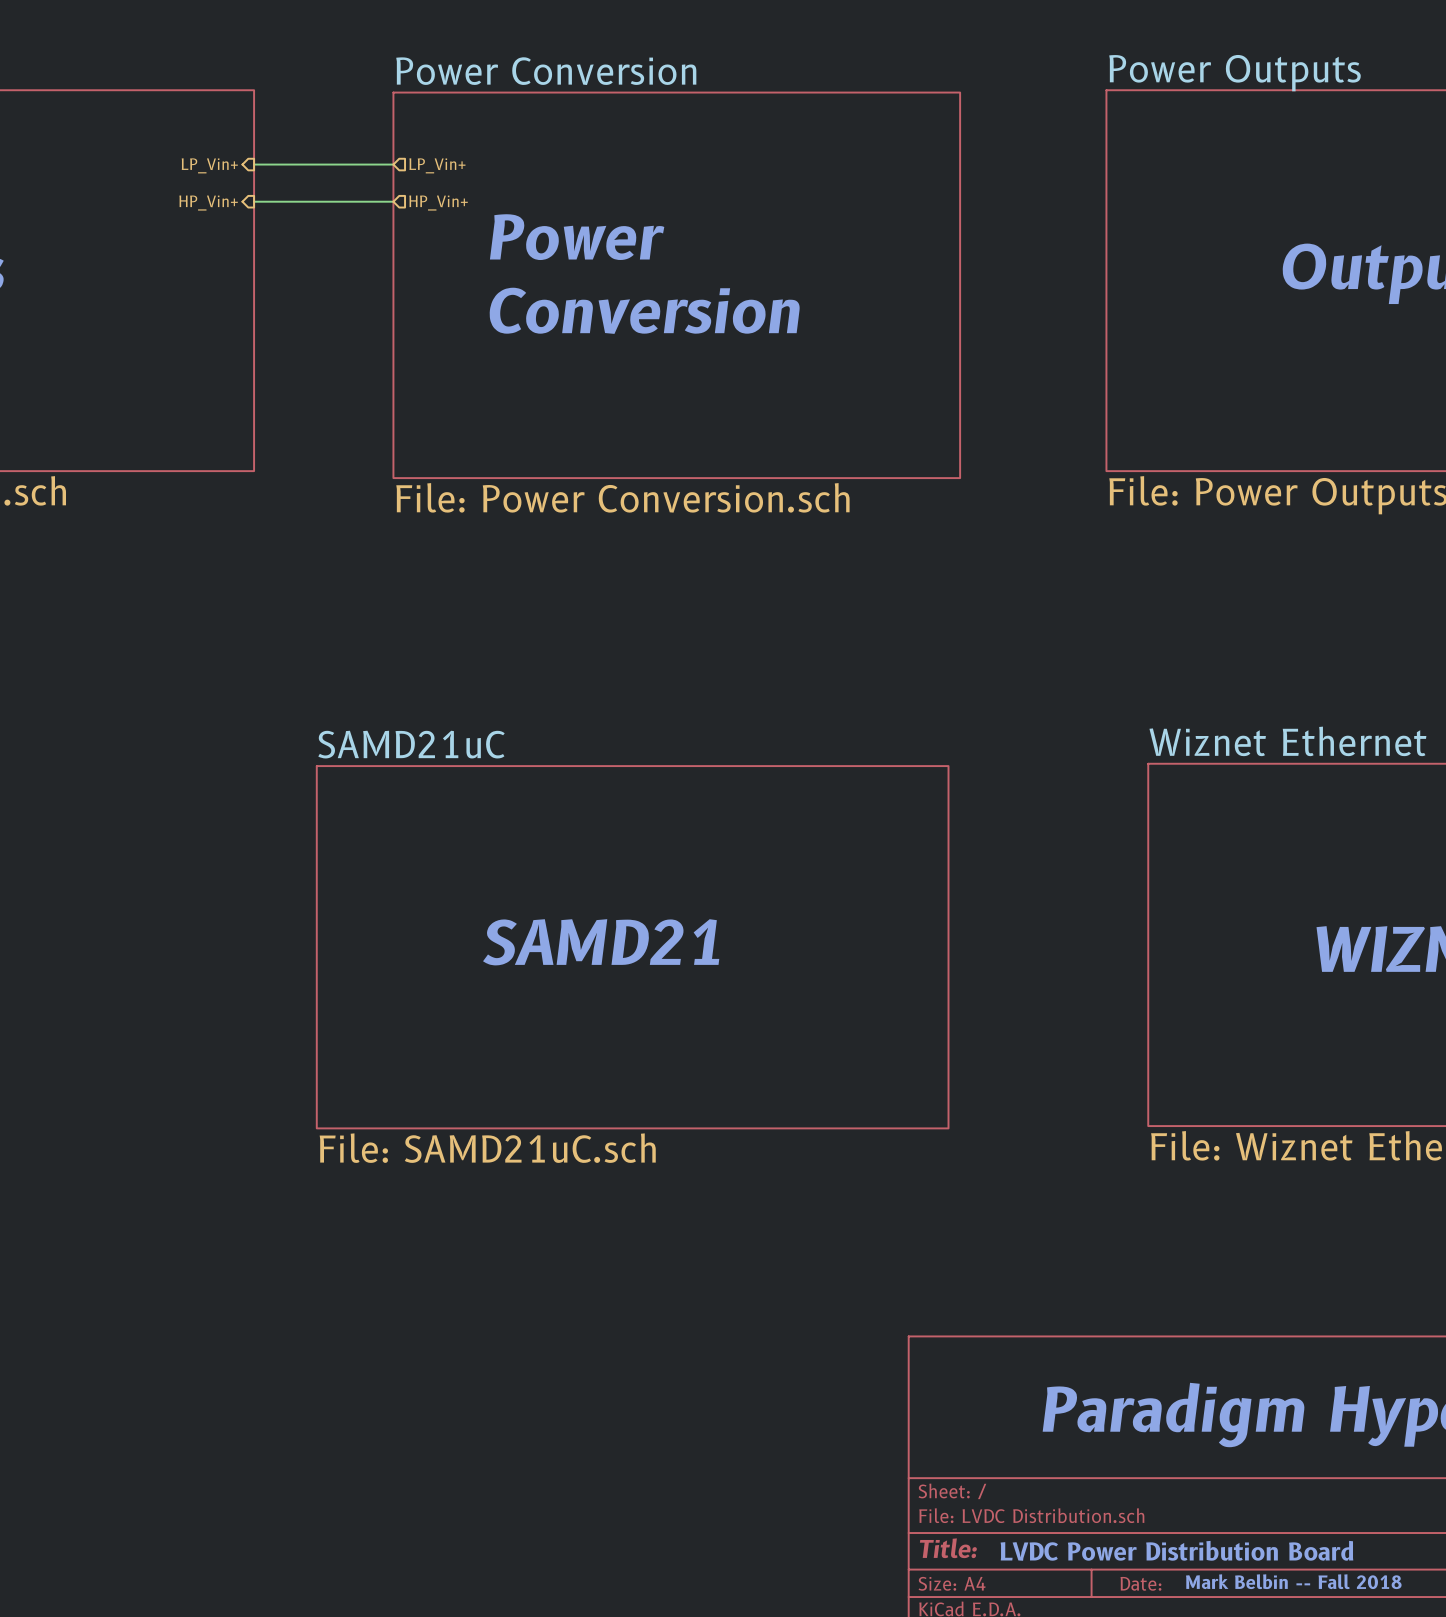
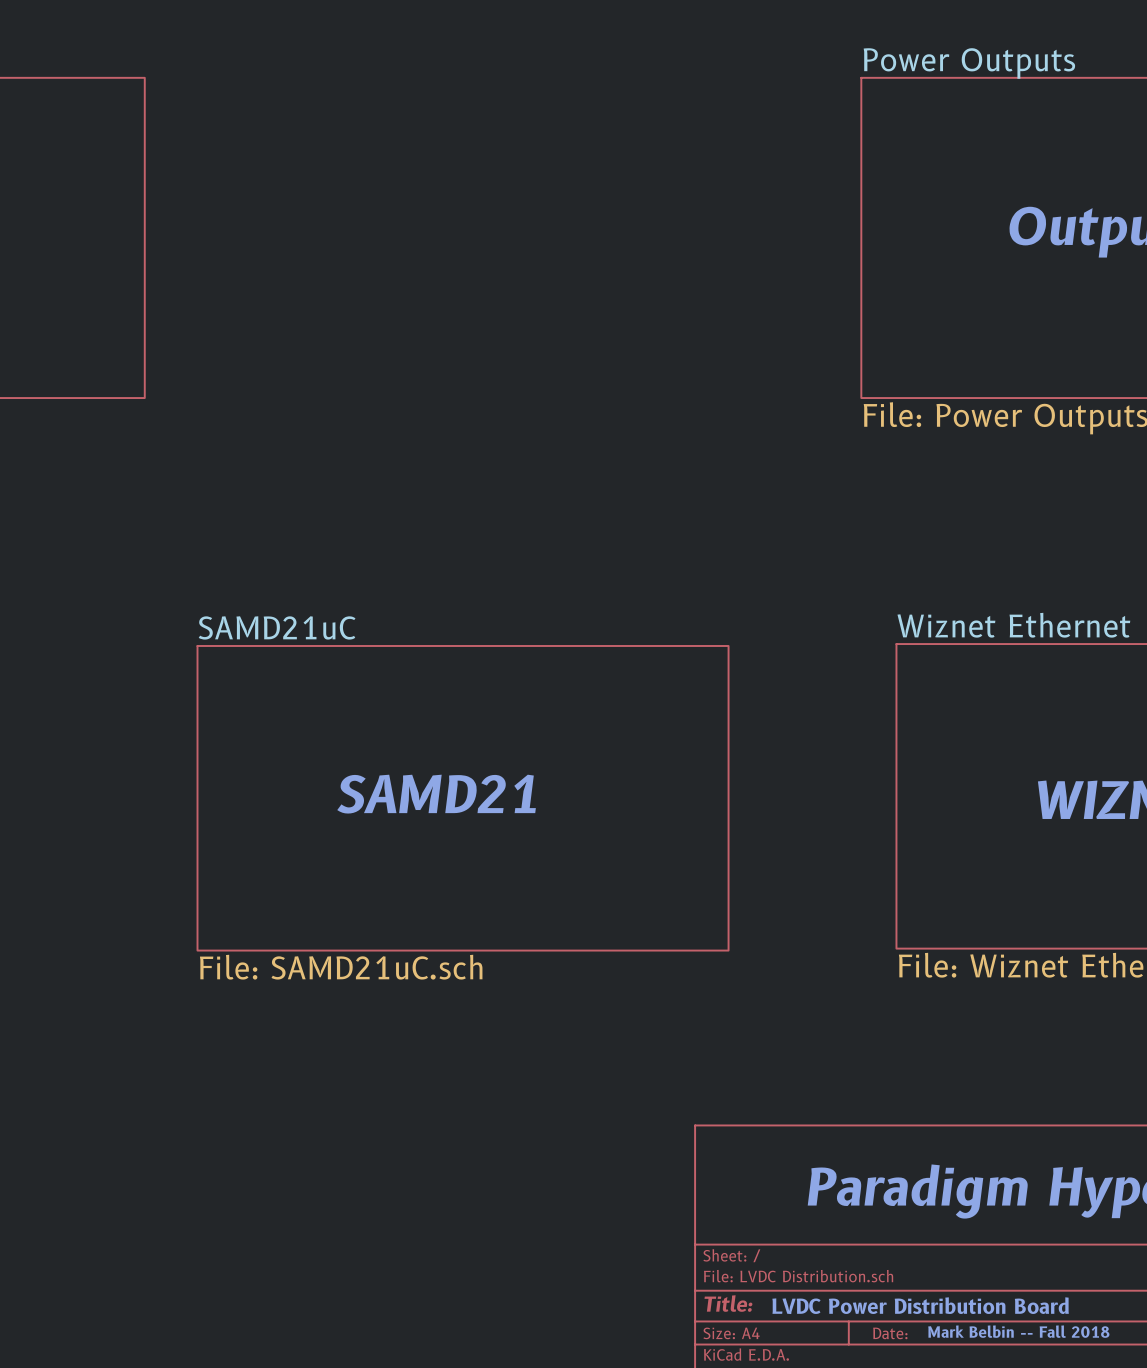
wire: (254, 164) (393, 164) -> none
hierarchical label: LP_Vin+ (209, 165) -> none
hierarchical label: LP_Vin+ (437, 165) -> none
wire: (254, 201) (393, 201) -> none
hierarchical label: HP_Vin+ (208, 203) -> none
hierarchical label: HP_Vin+ (438, 203) -> none
text: Power (577, 237) -> none
sheet Power Conversion: File: Power Conversion.sch (676, 285) -> none
text: Conversion (644, 310) -> none

